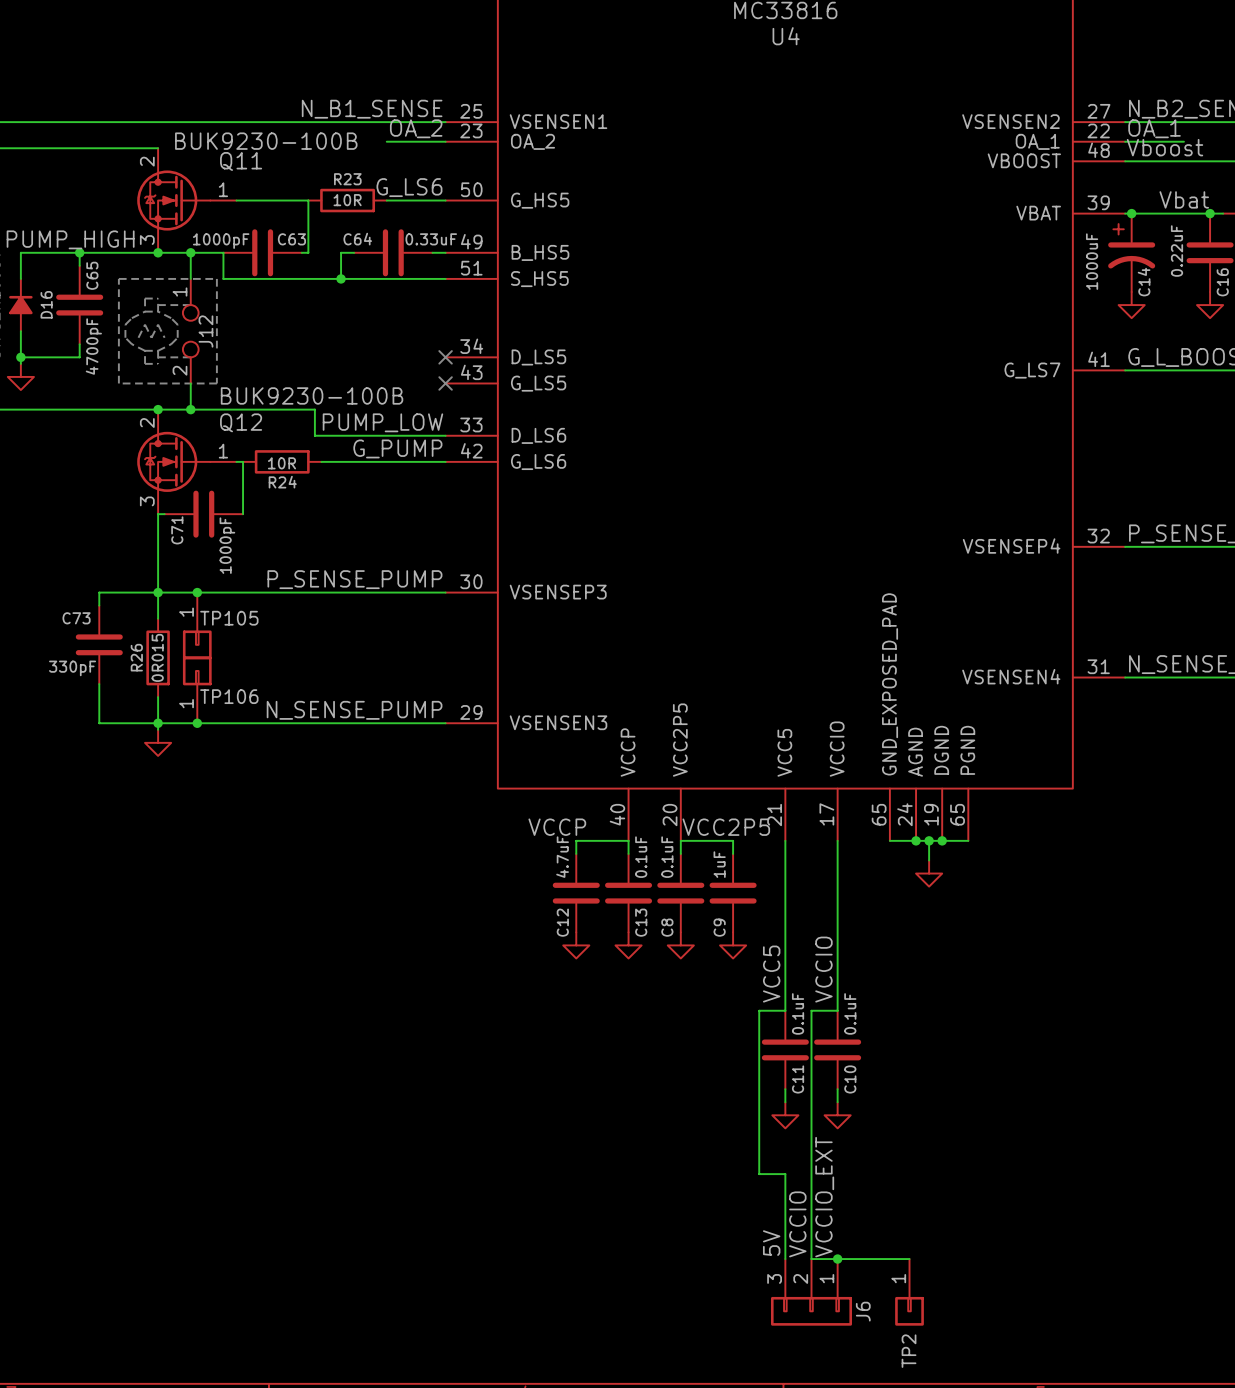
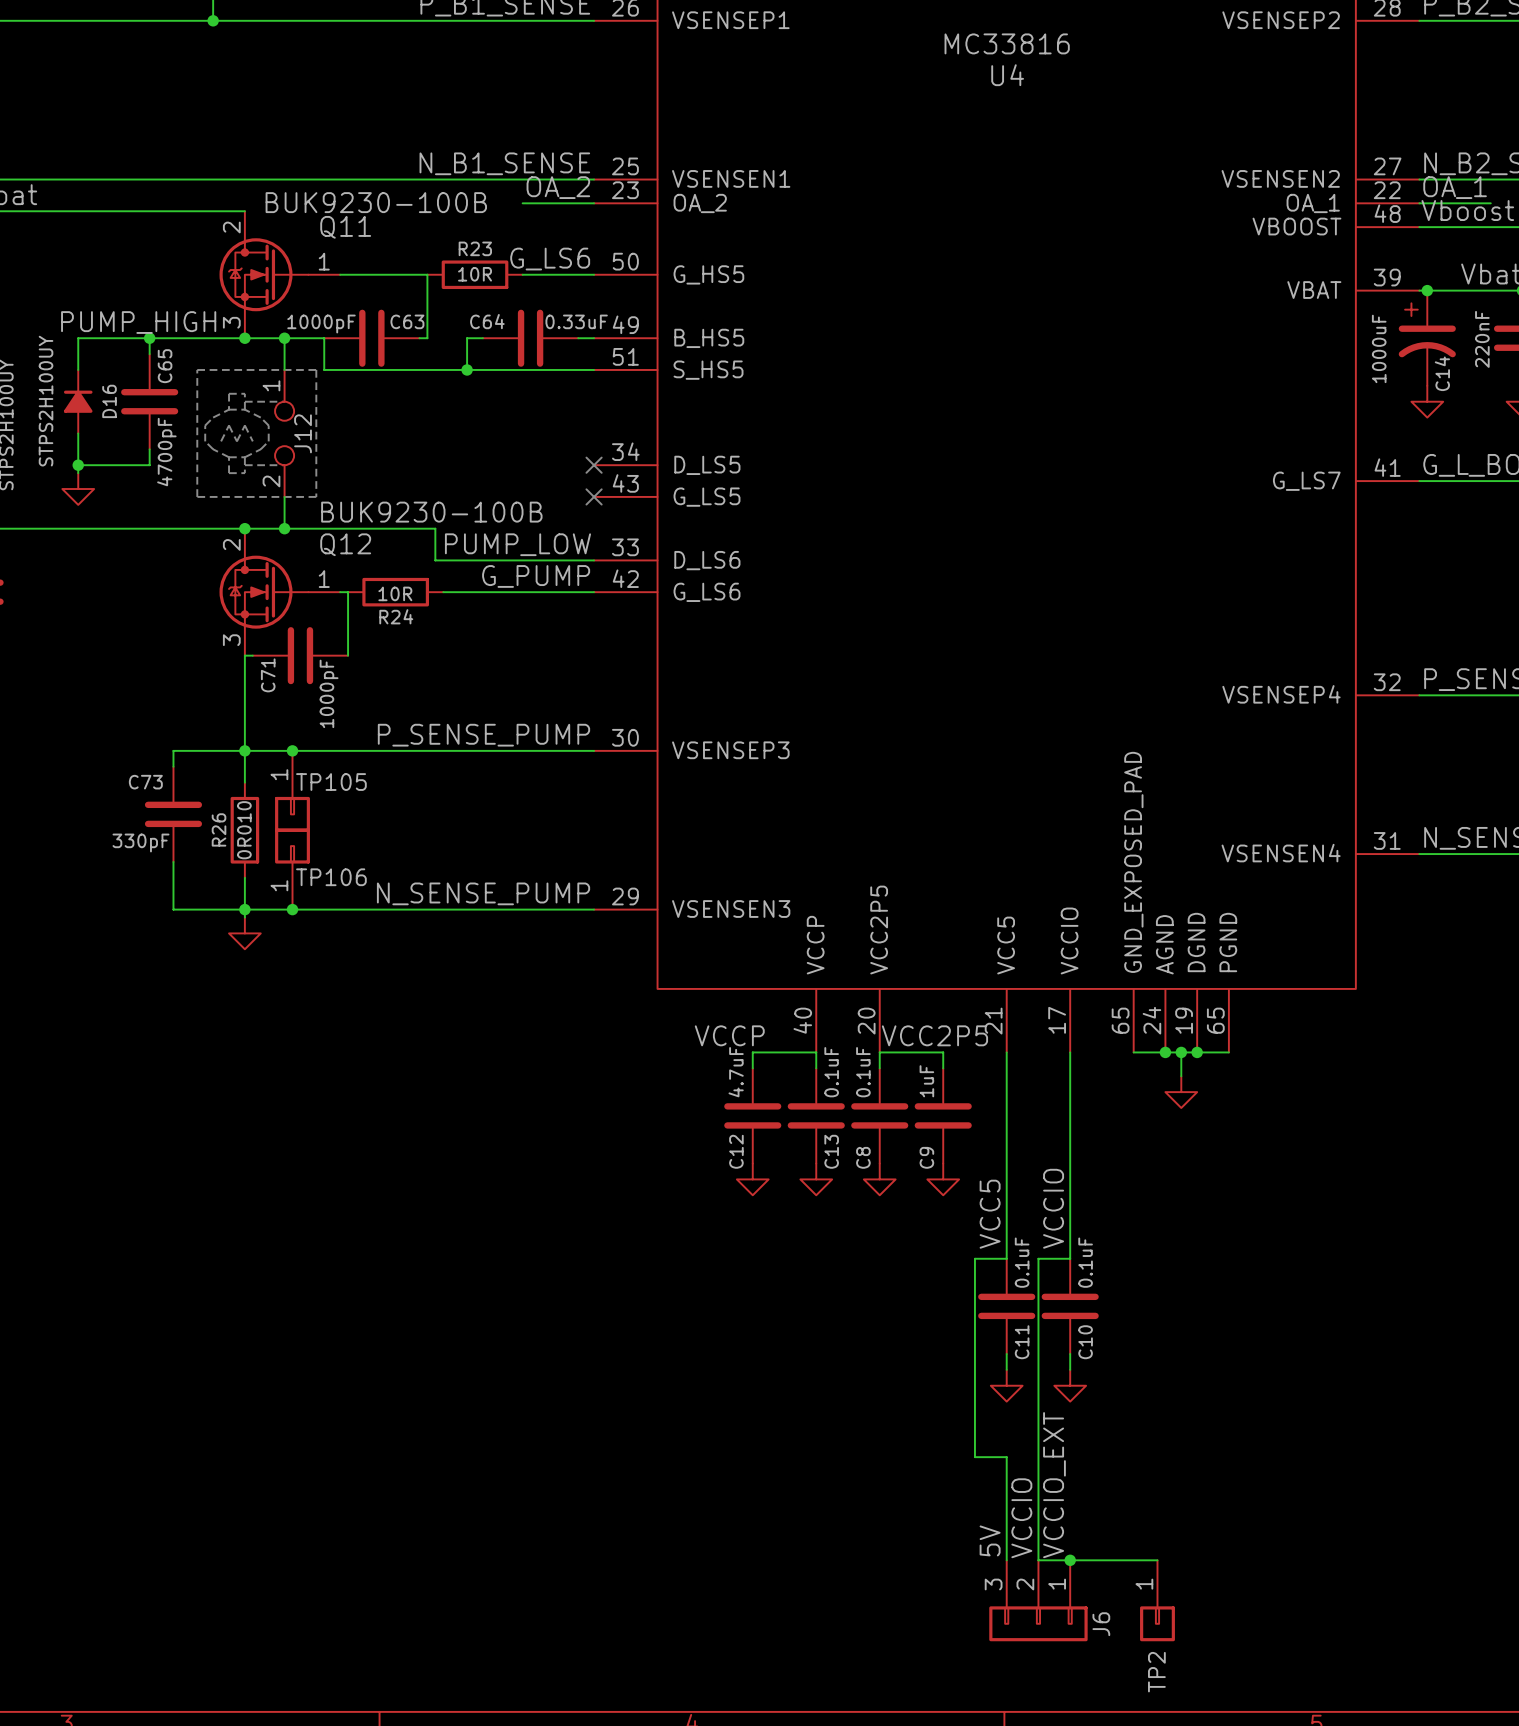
C16 value: 0.22uF (1177, 251) -> 220nF (1482, 339)
R26 value: 0R015 (157, 657) -> 0R010 (244, 830)

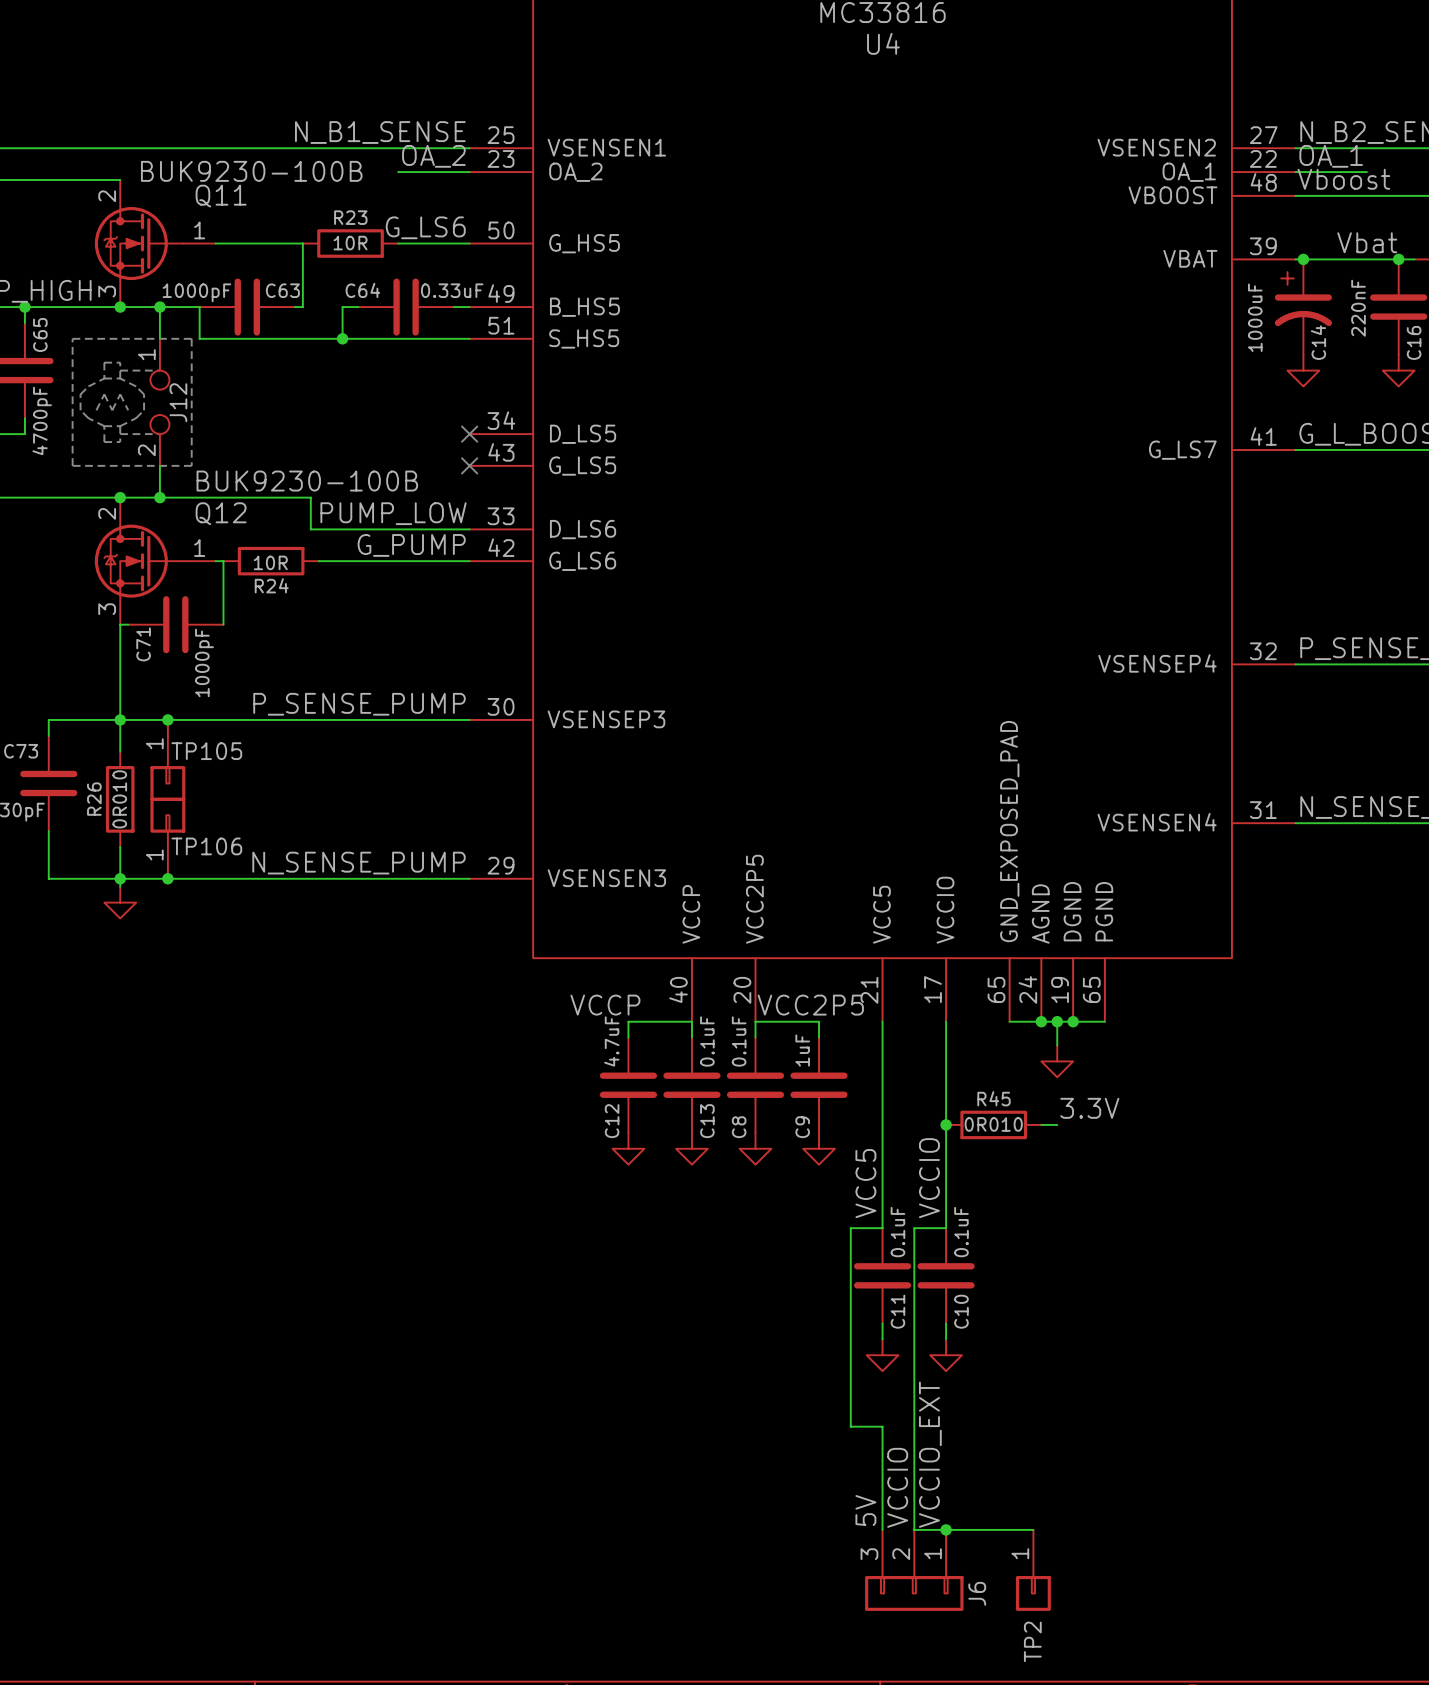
label: none -> 3.3V (1089, 1108)
junction: none -> (946, 1124)
R45: none -> 0R010 (993, 1124)
wire: none -> (1041, 1124) (1057, 1124)

